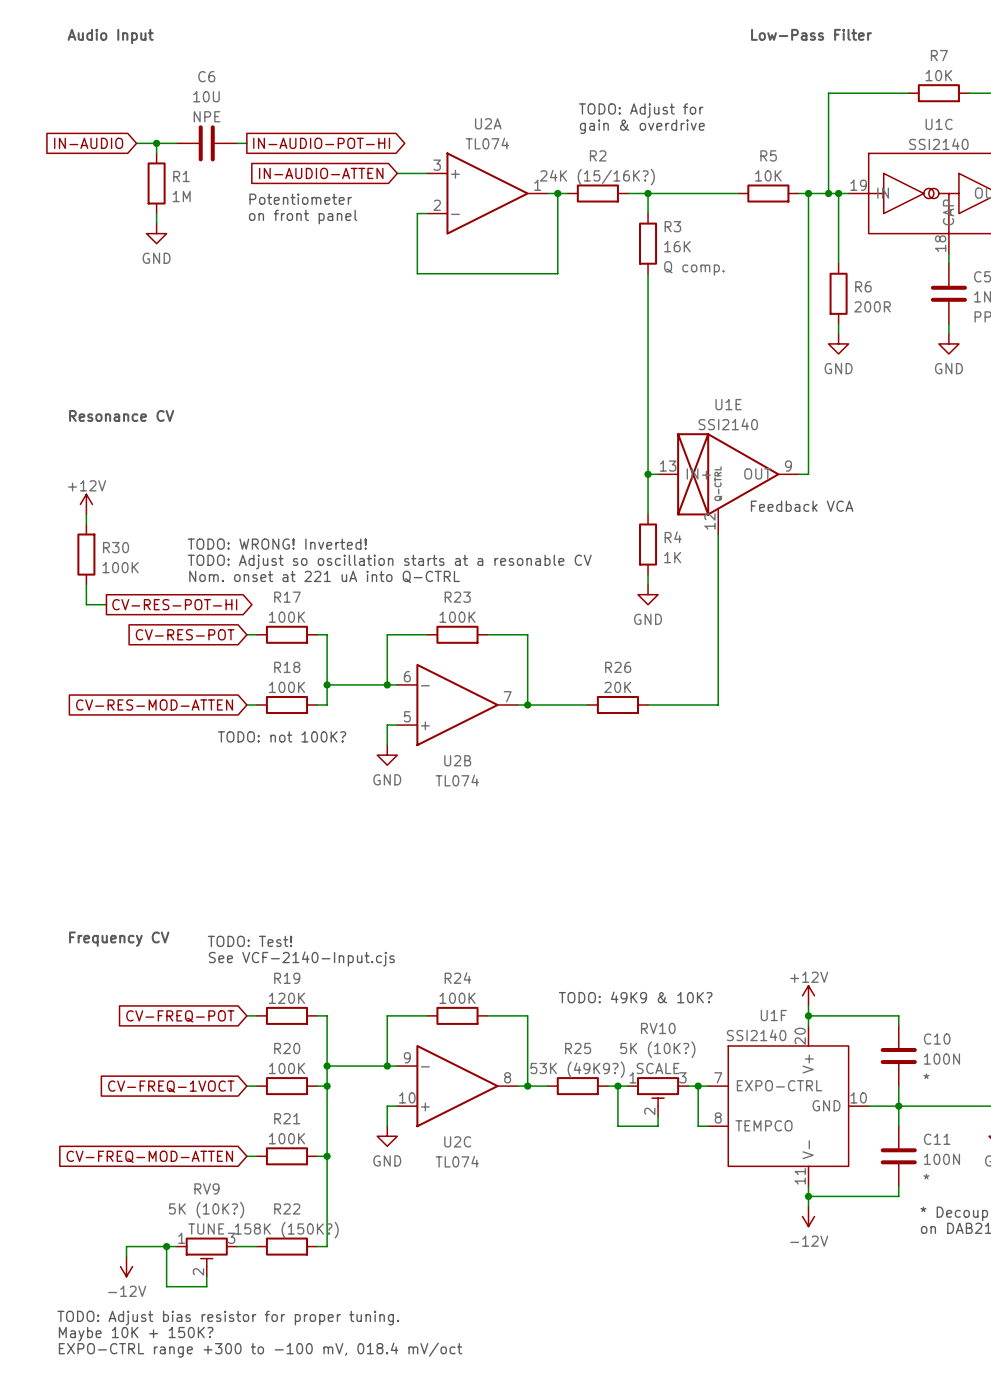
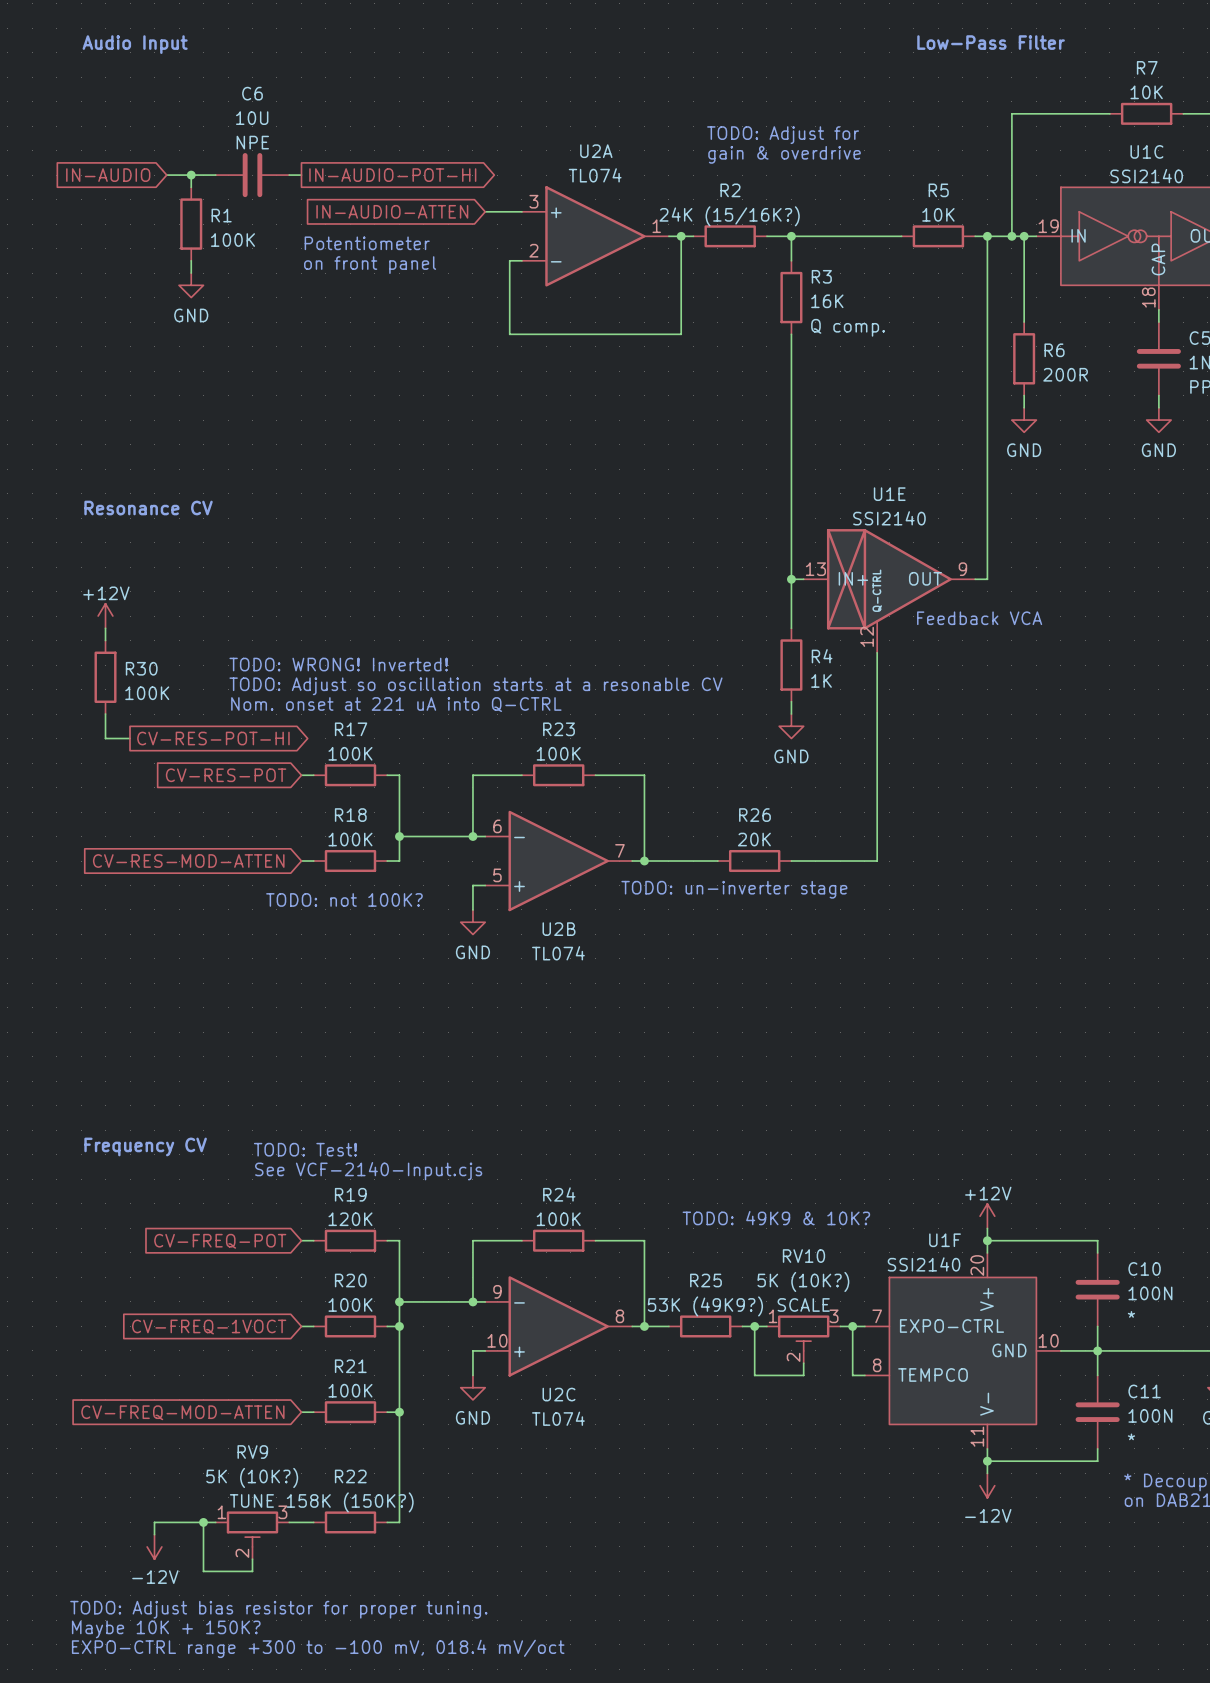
R1 value: 1M (181, 196) -> 100K (232, 240)
text: none -> TODO: un-inverter stage (734, 889)

